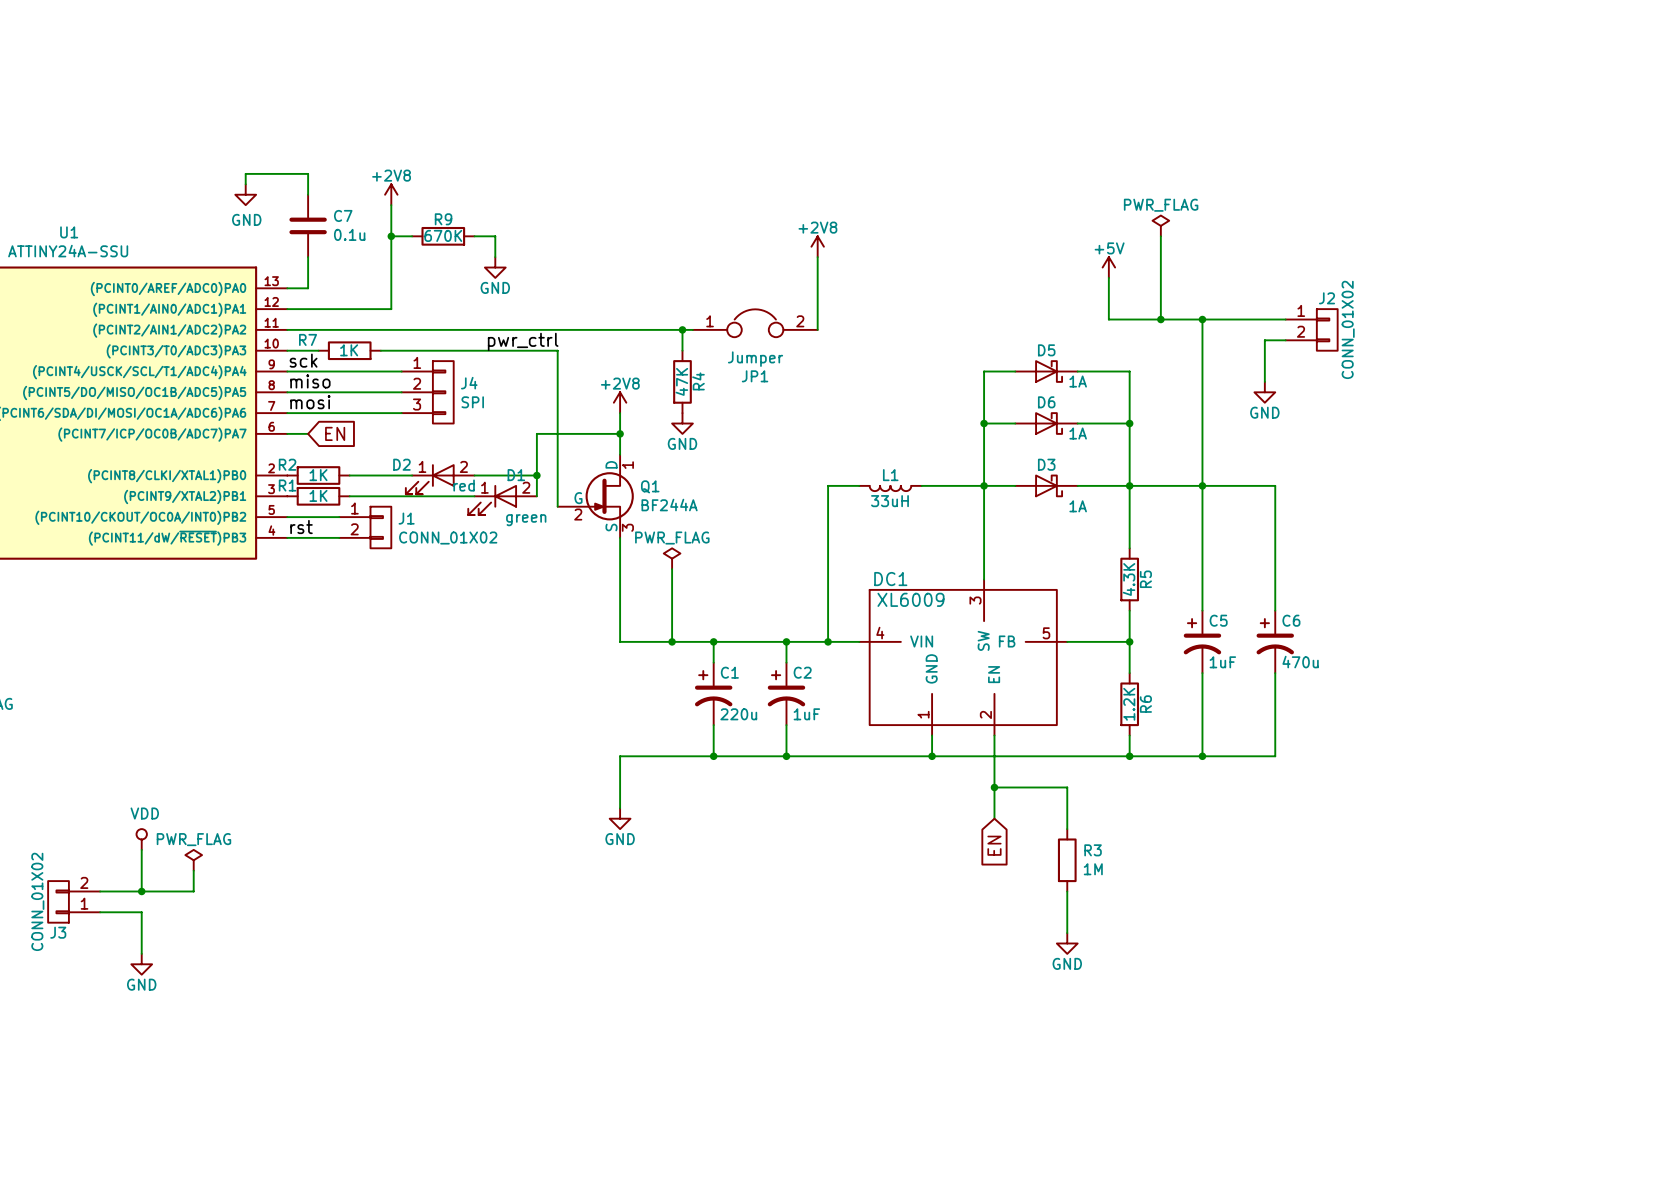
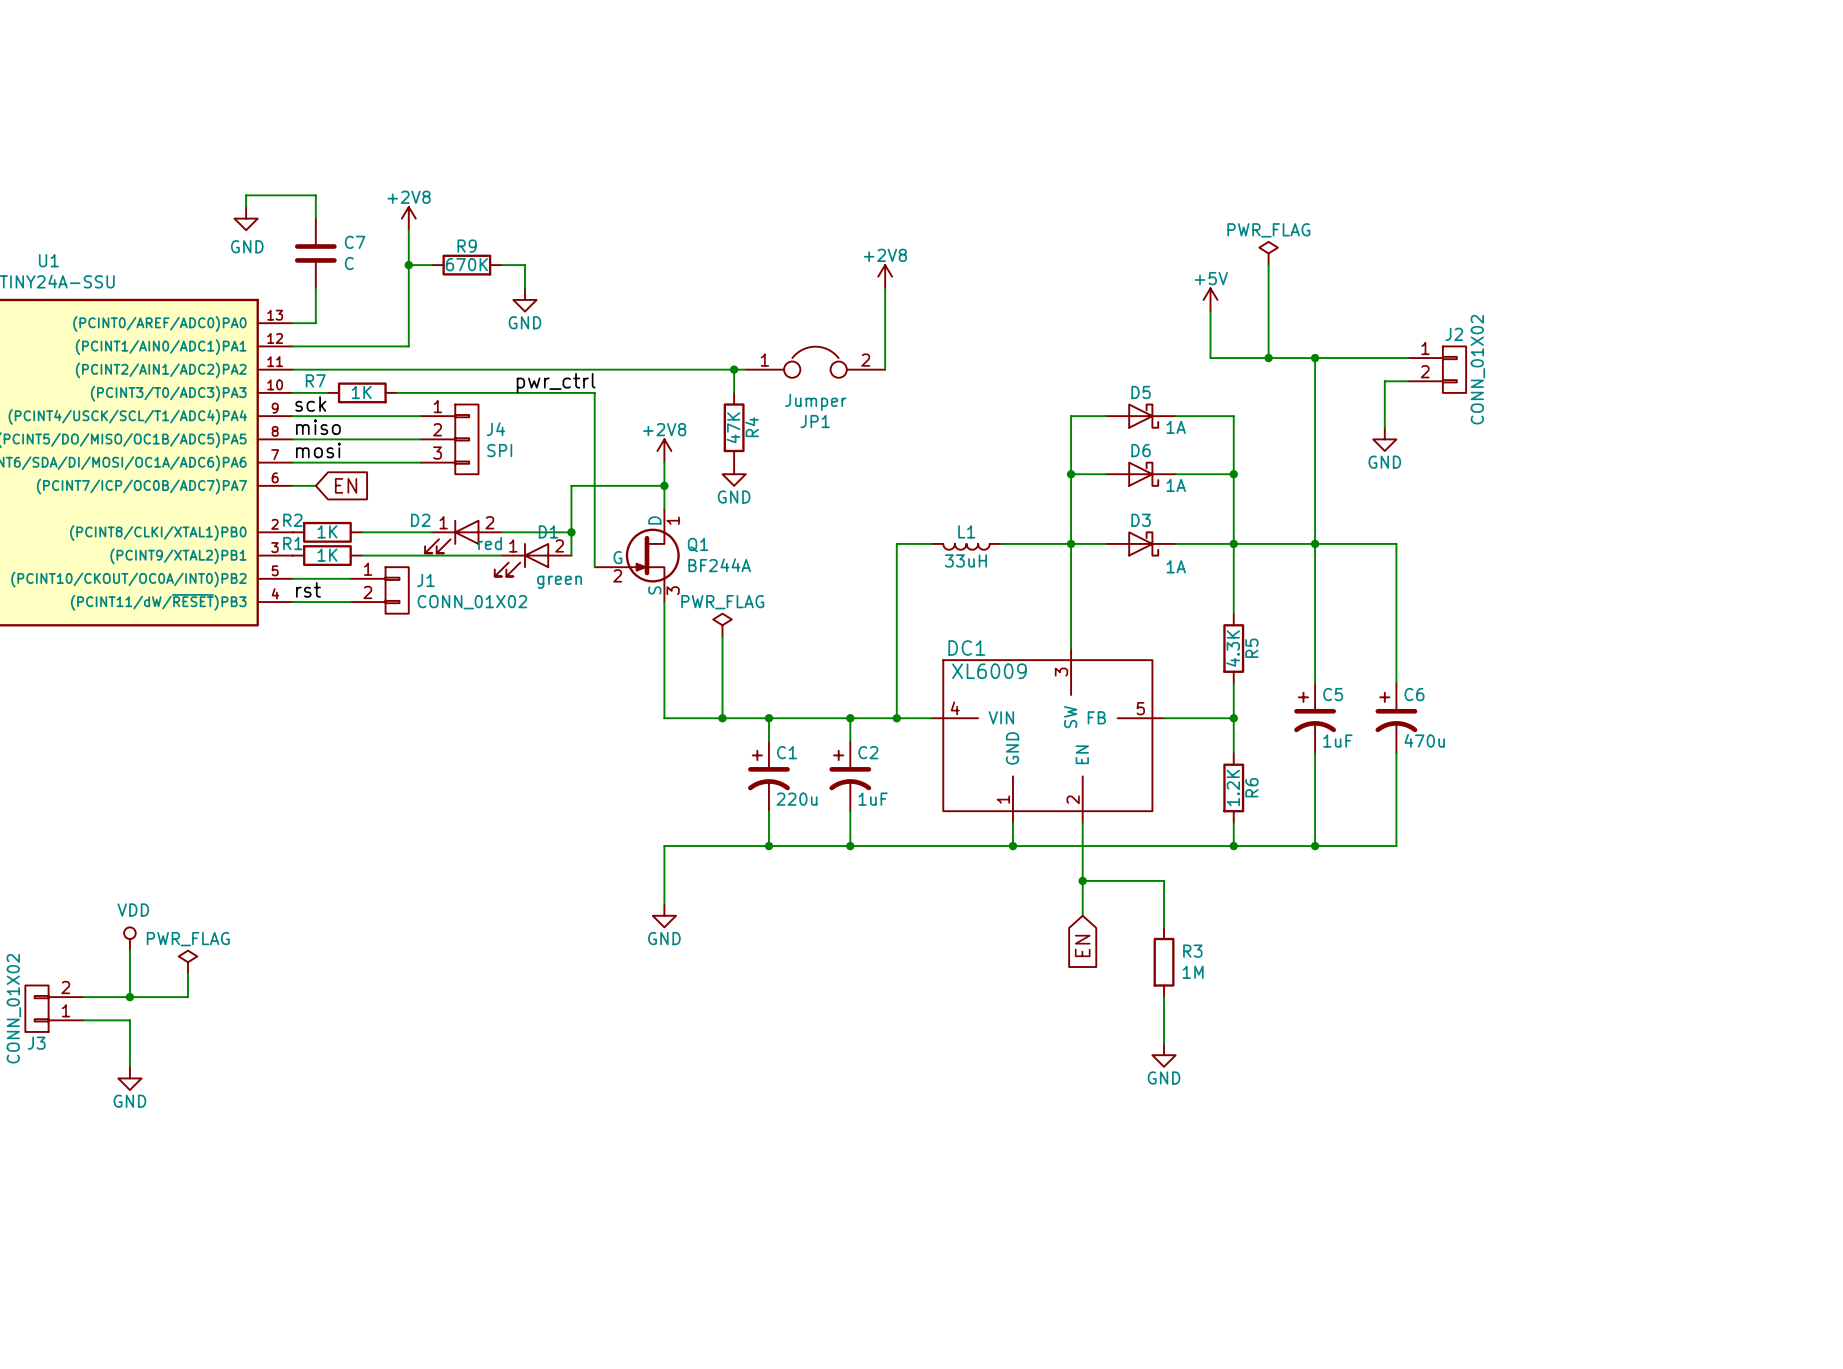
C7 value: 0.1u (349, 234) -> C (349, 263)

